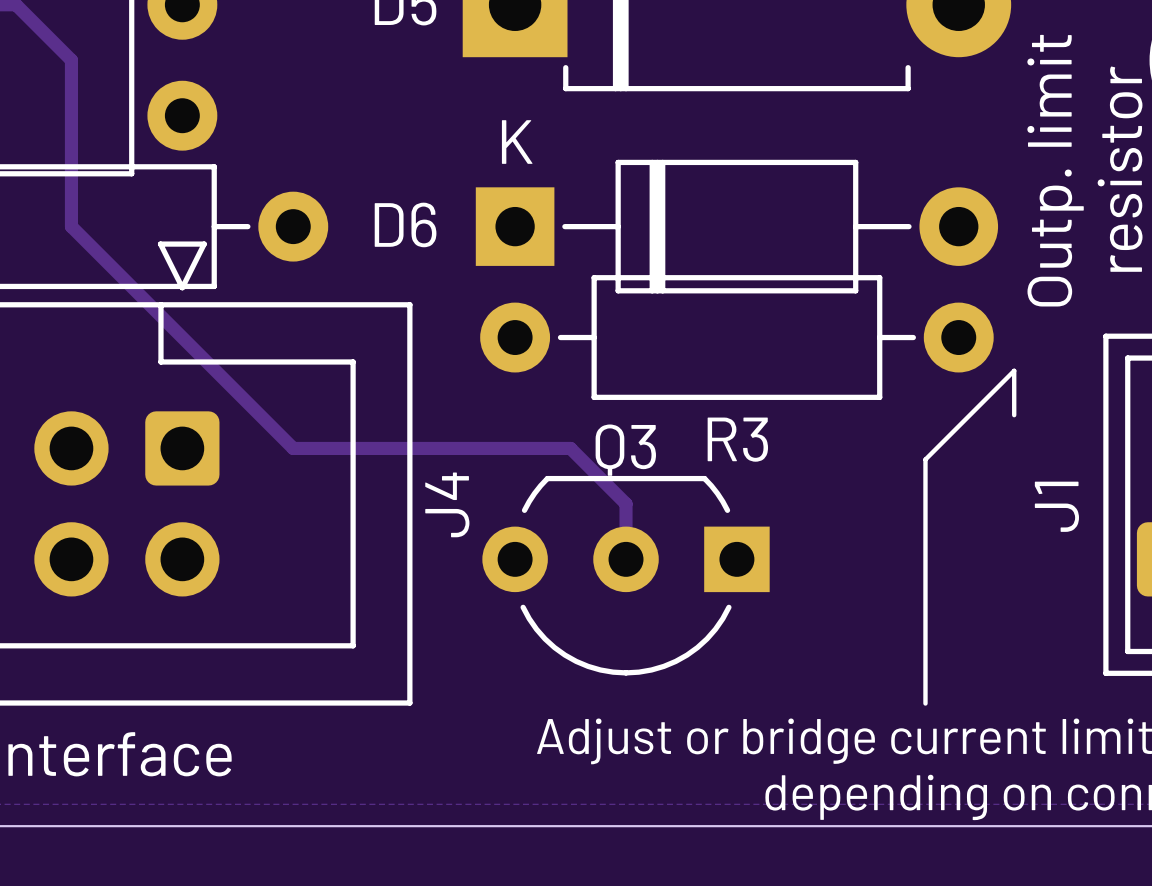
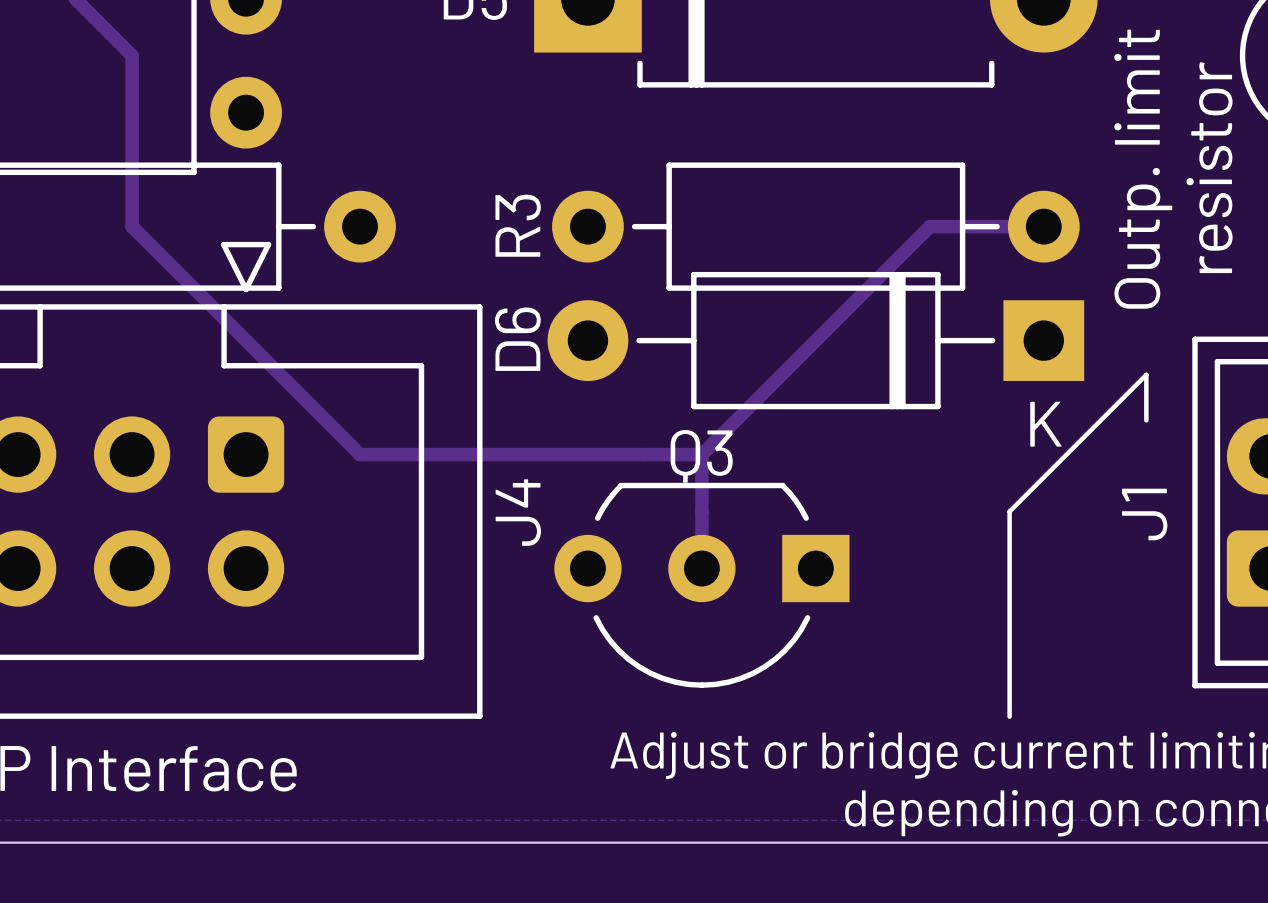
D6 rotation: 0° (736, 226) -> 180° (815, 340)
track: none -> (1043, 226) (929, 226) (701, 454)
R3 position: (736, 337) -> (815, 226)
line: (1014, 415) (1014, 370) (925, 459) (925, 503) -> (1146, 420) (1146, 374) (1009, 511)
R3 name rotation: 0° (737, 439) -> 90° counterclockwise (518, 225)
R3 name position: R3 (737, 439) -> R3 (518, 225)
track: (570, 448) (626, 503) -> (701, 454) (701, 511)
track: none -> (644, 454) (701, 454)

